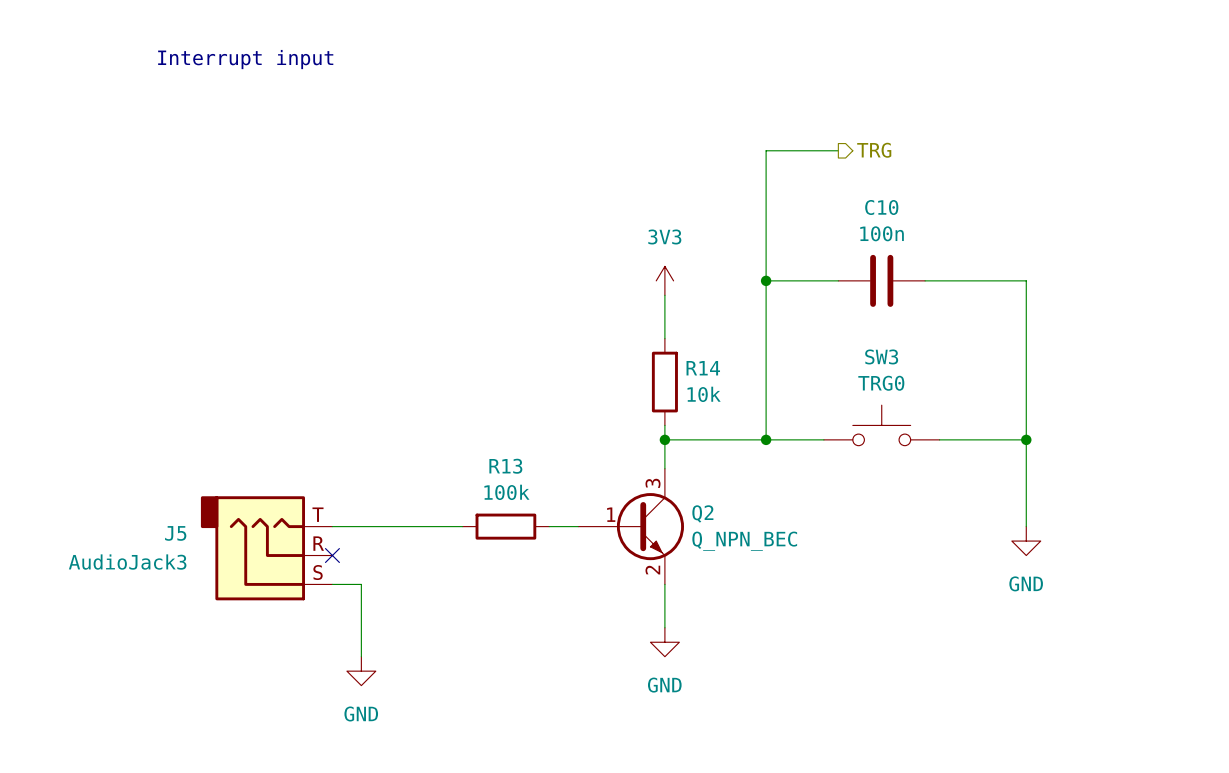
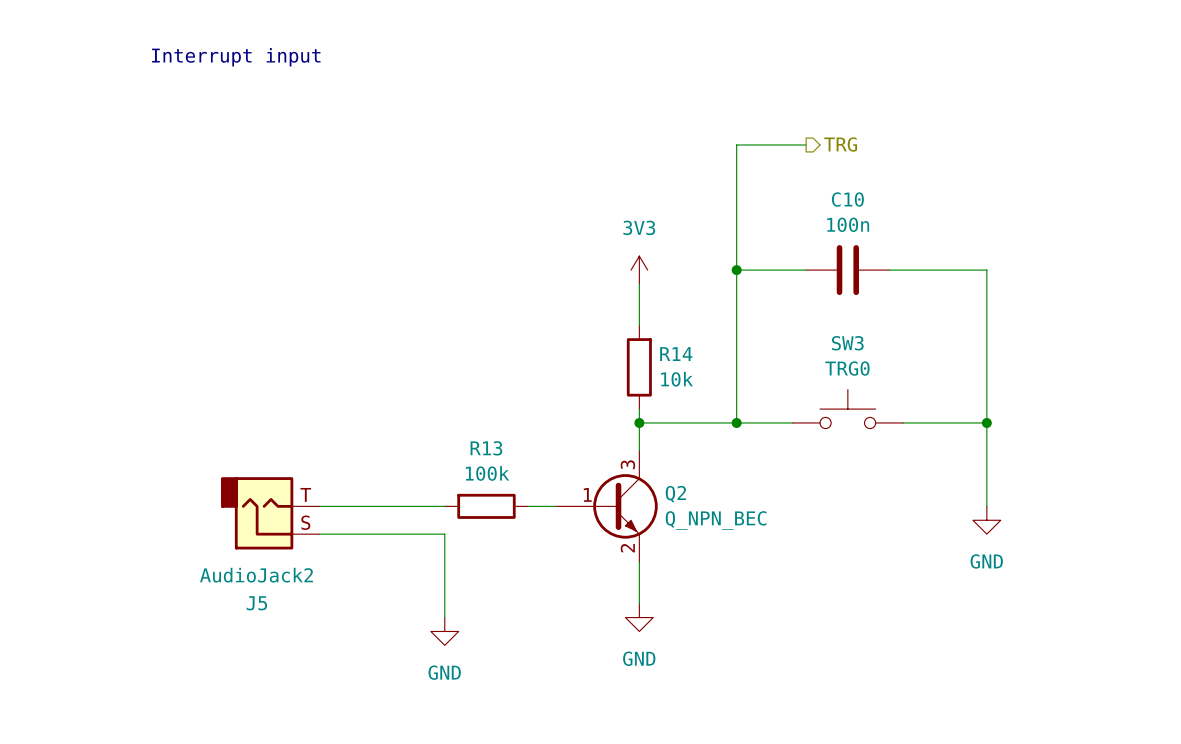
J5 symbol: [200, 496, 333, 601] -> [220, 477, 320, 550]
J5 name position: J5 (175, 533) -> J5 (256, 603)
wire: none -> (319, 534) (444, 534) (444, 617)
no-connect mark: (332, 555) -> none
J5 value: AudioJack3 (127, 562) -> AudioJack2 (256, 575)
wire: (332, 584) (361, 584) (361, 656) -> none
power symbol position: GND (361, 671) -> GND (444, 631)

